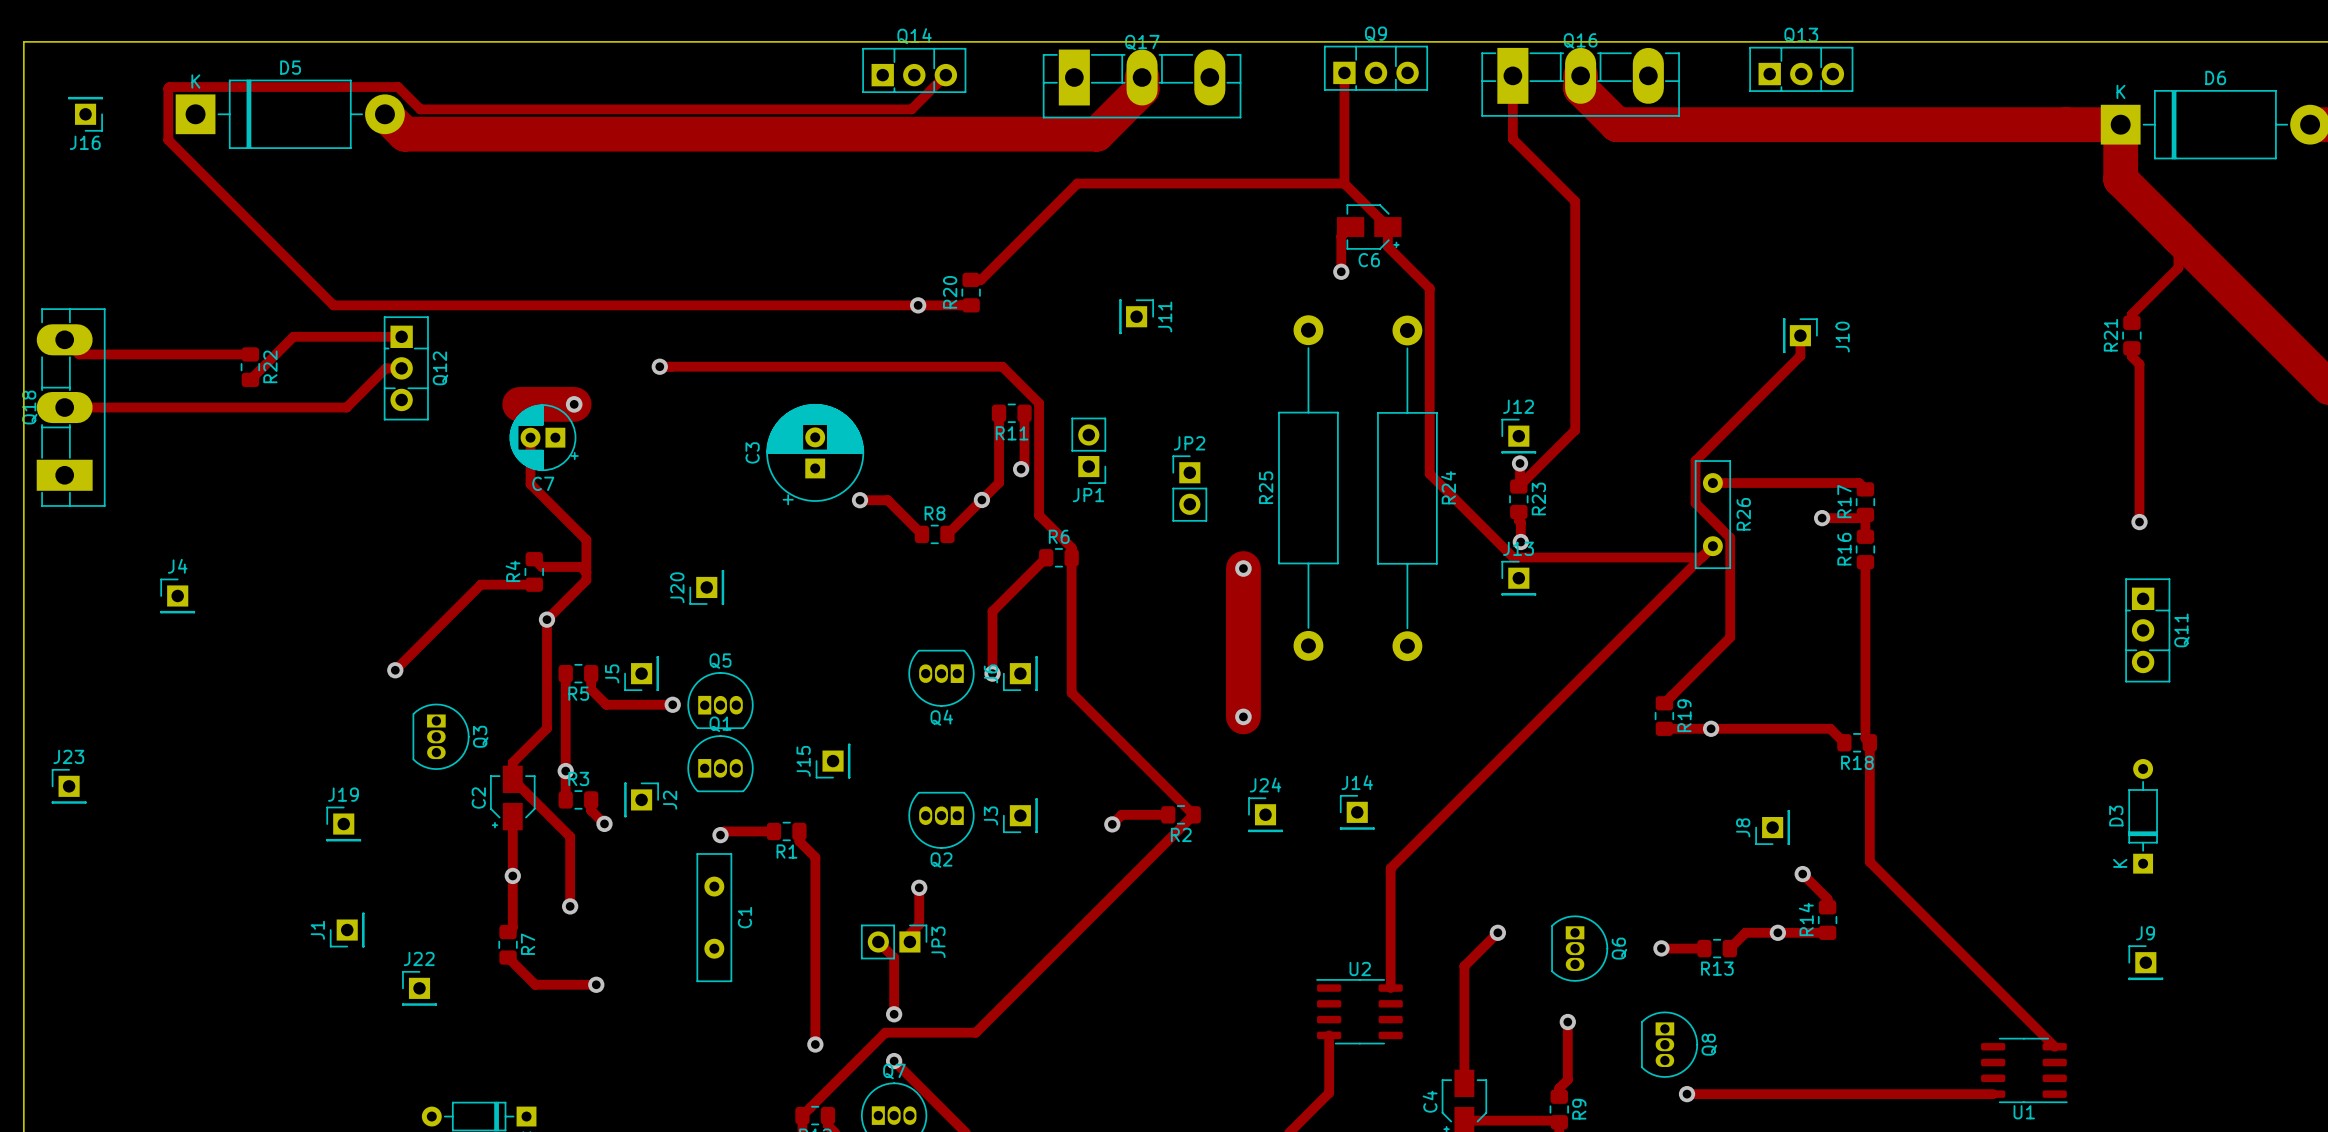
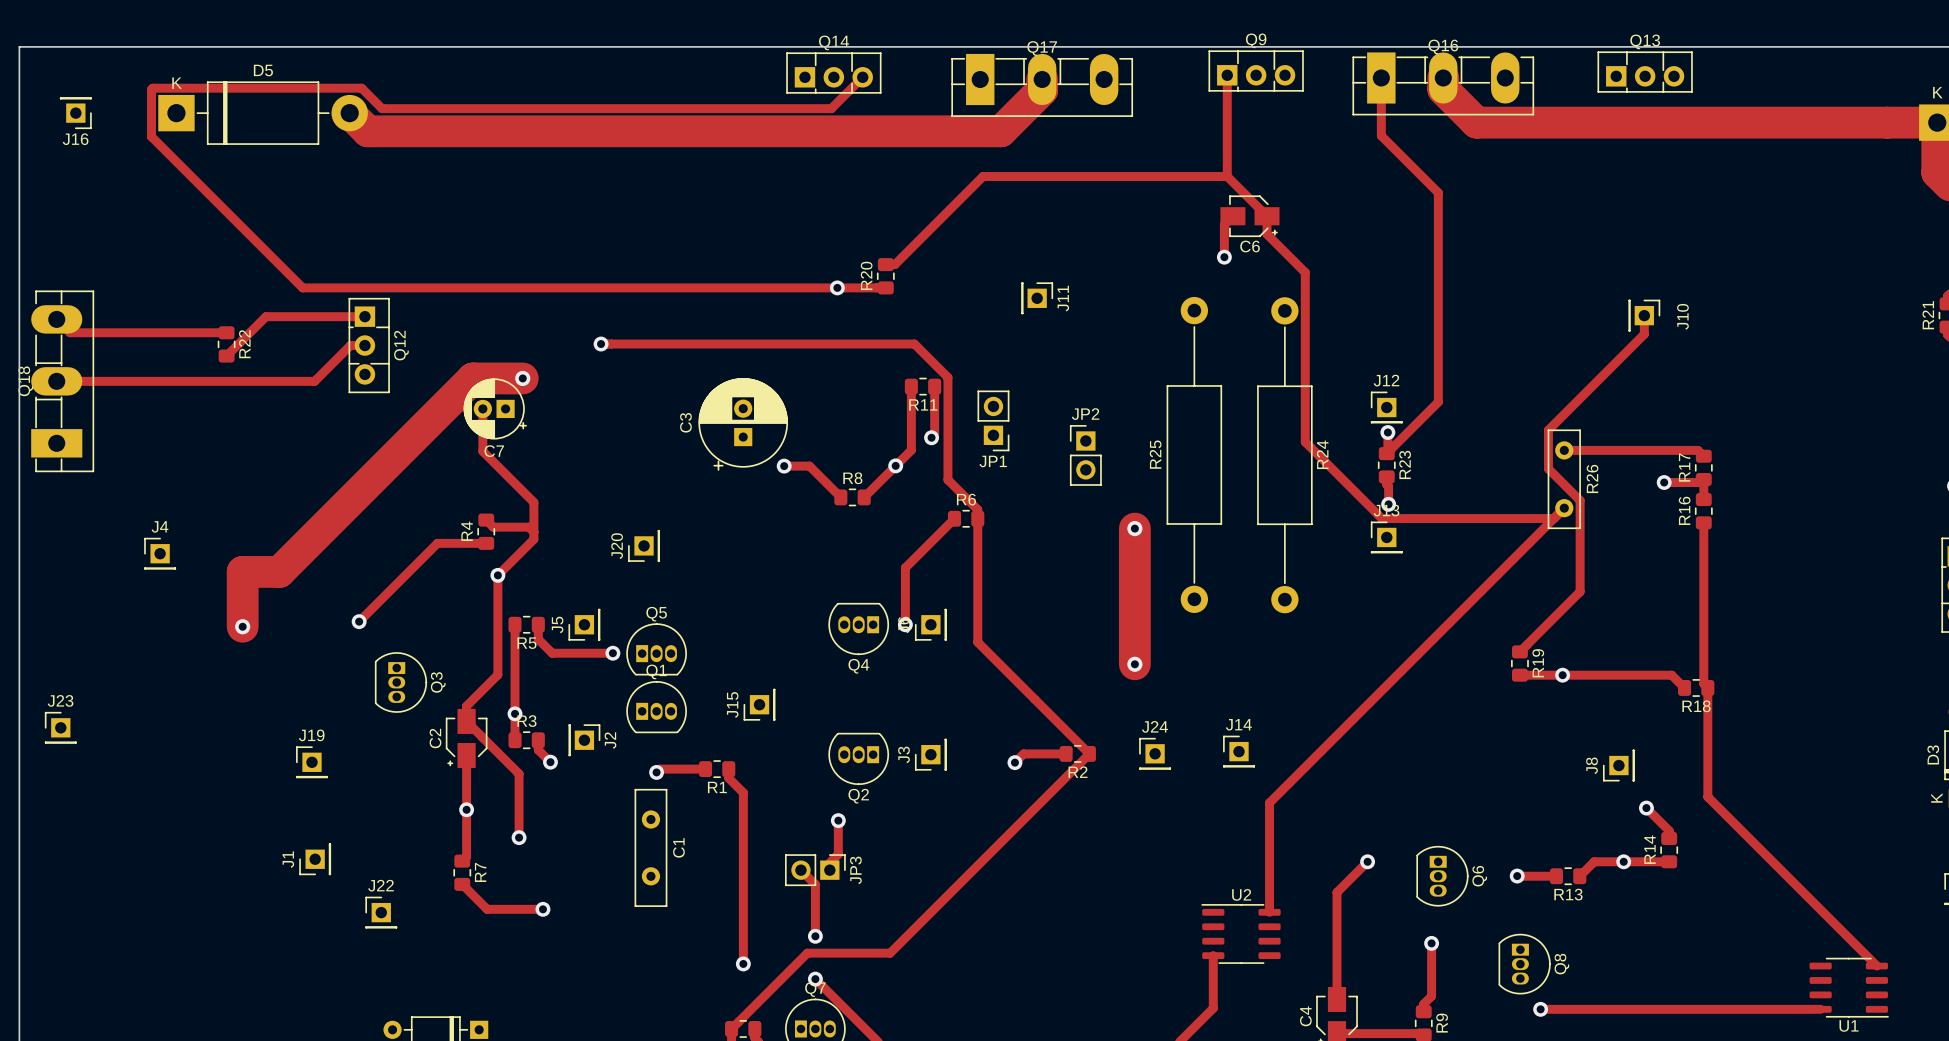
track: none -> (472, 378) (279, 571) (242, 571) (242, 626)
via: none -> (242, 626)

